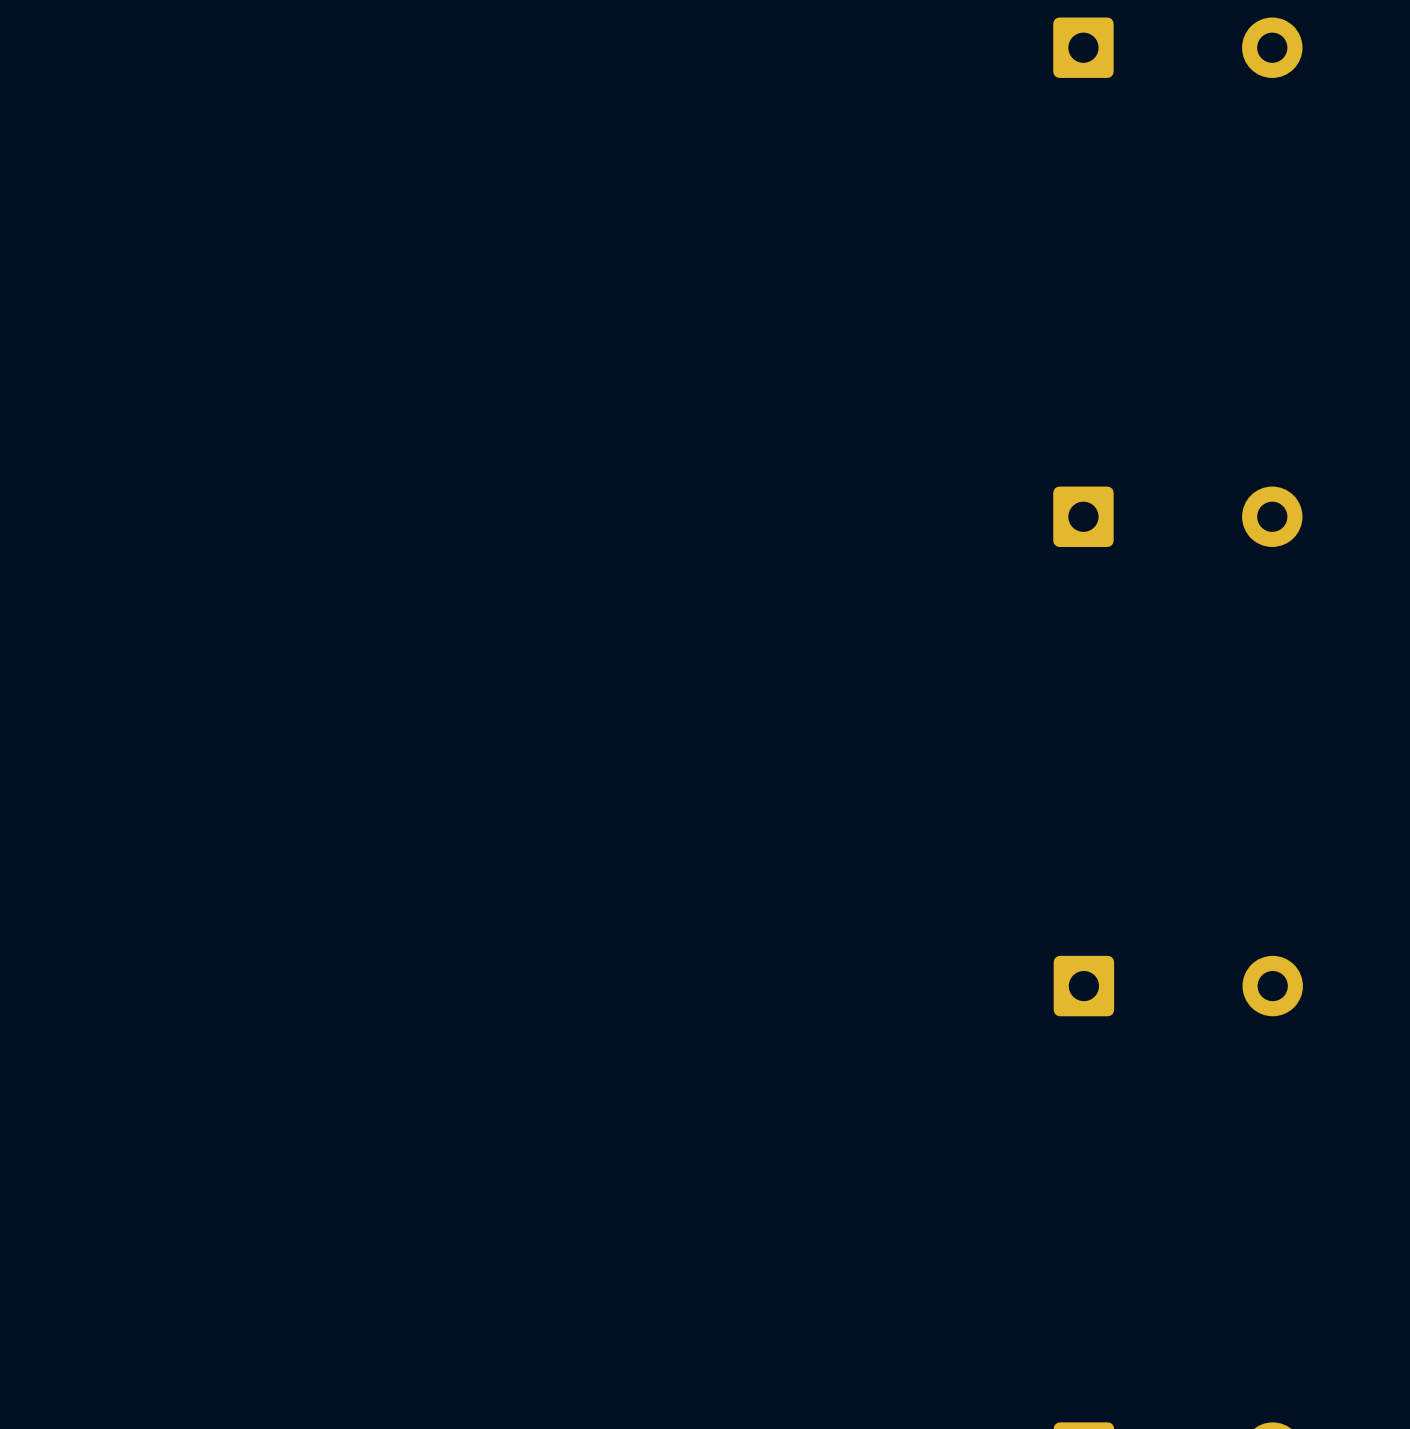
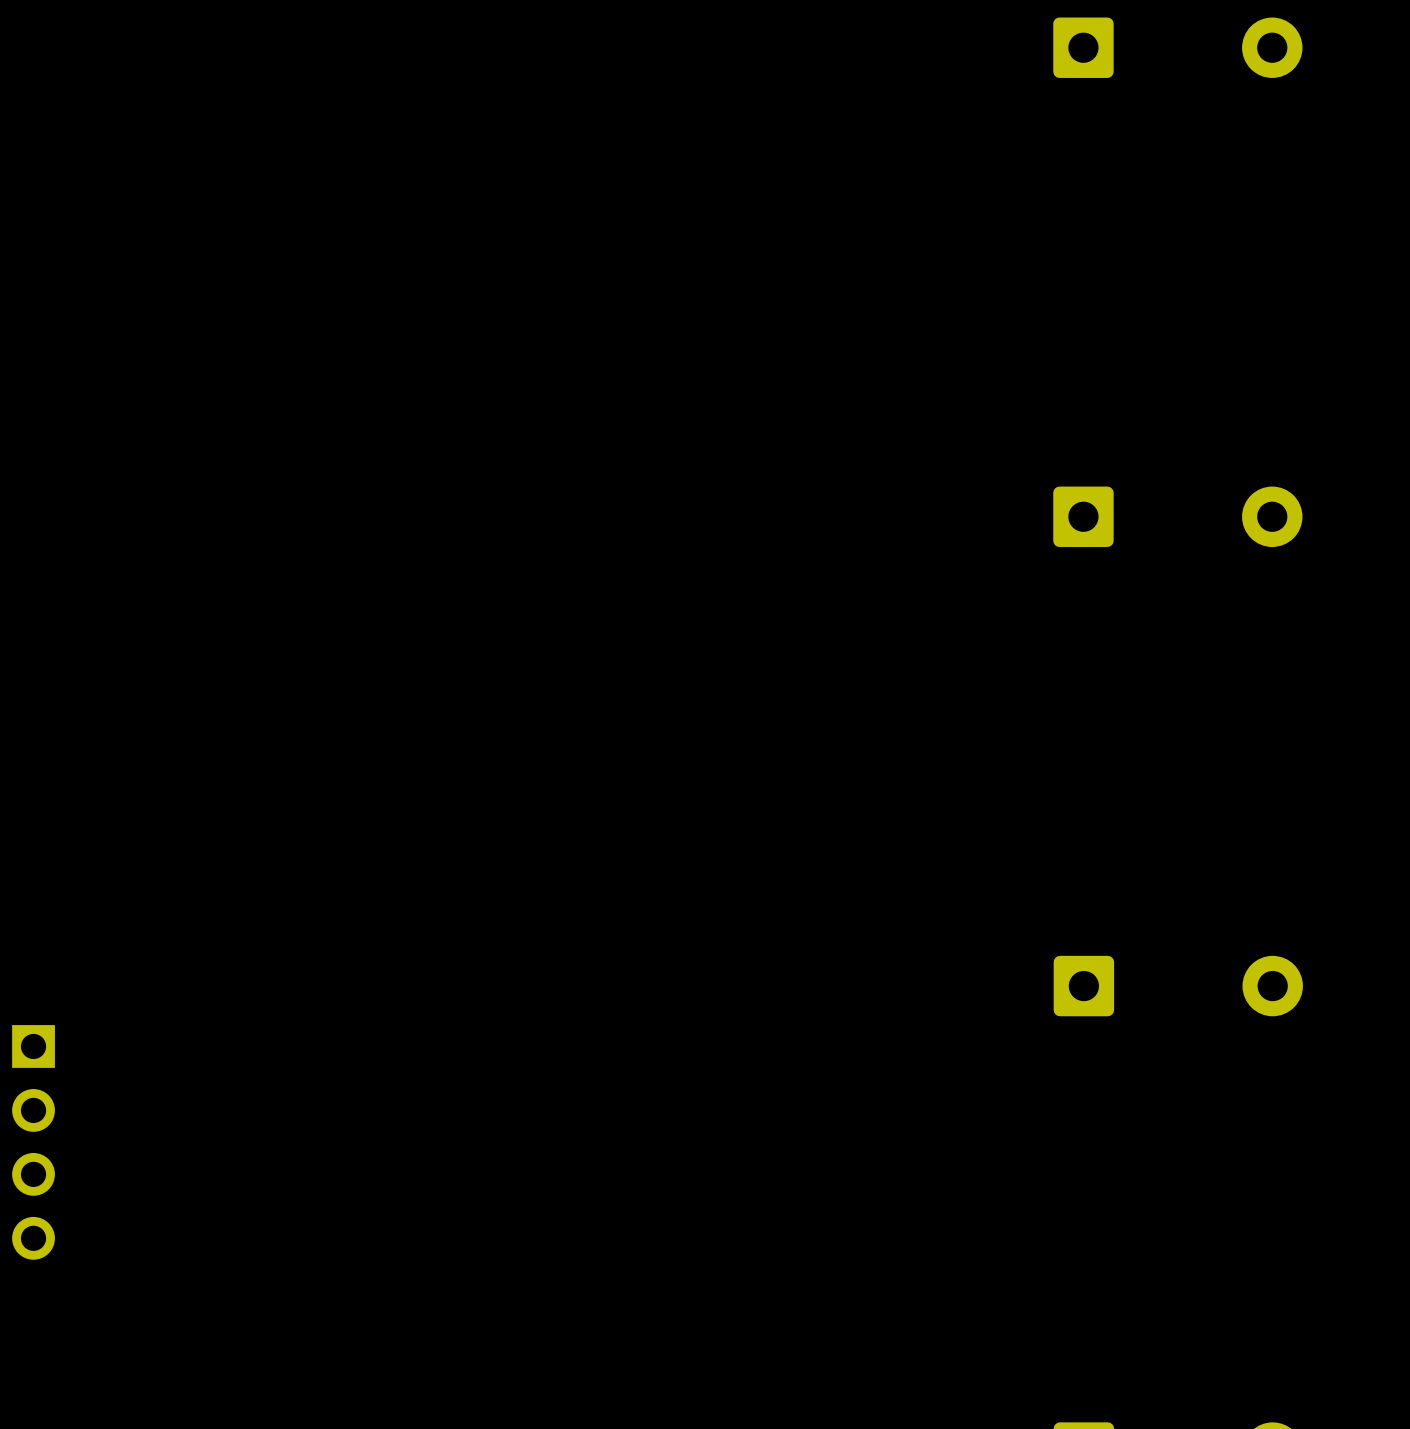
part: none -> (33, 1142)

